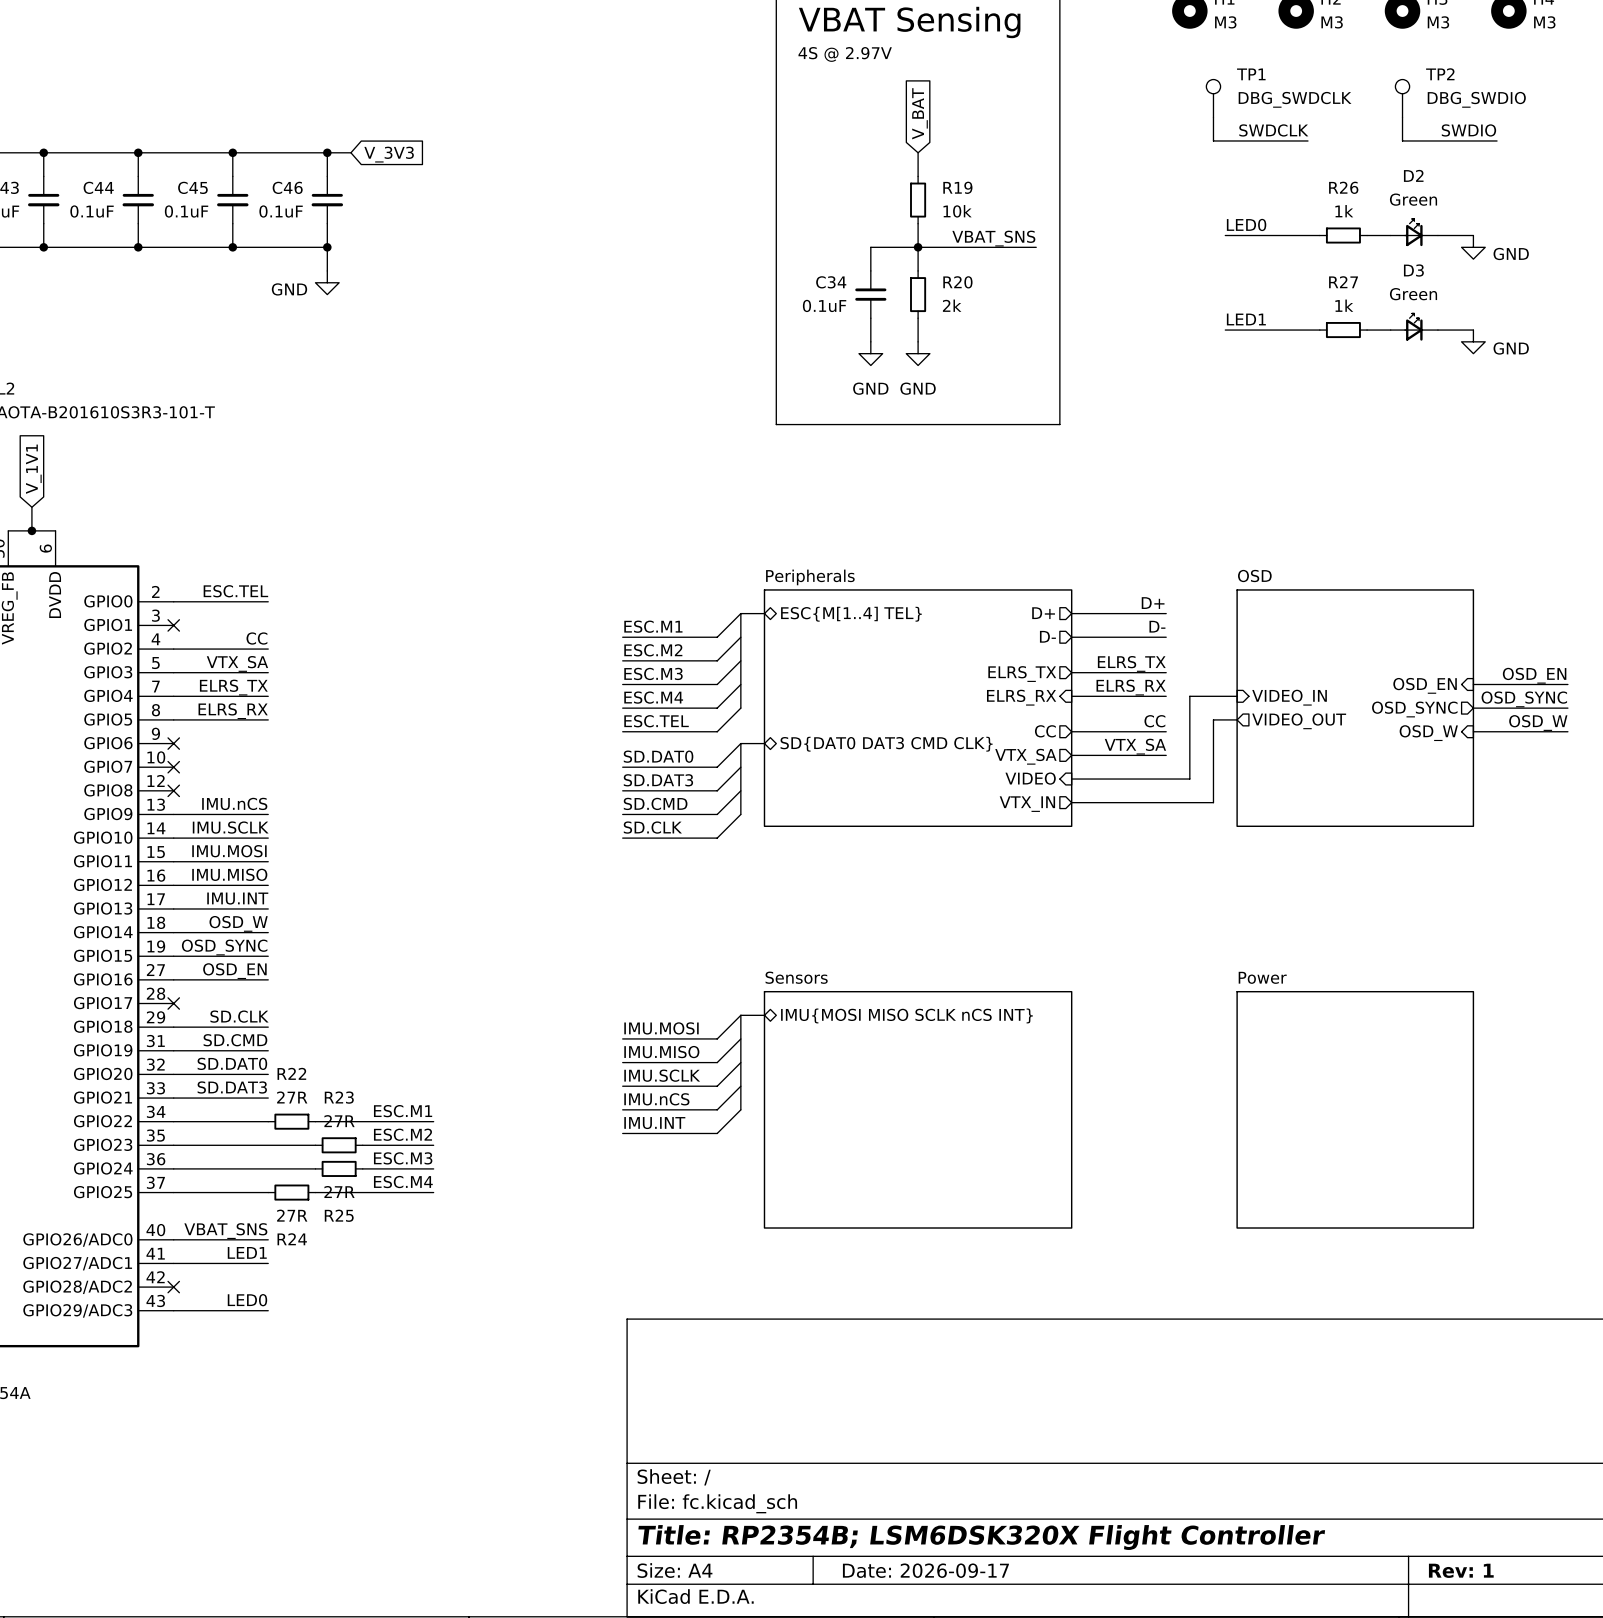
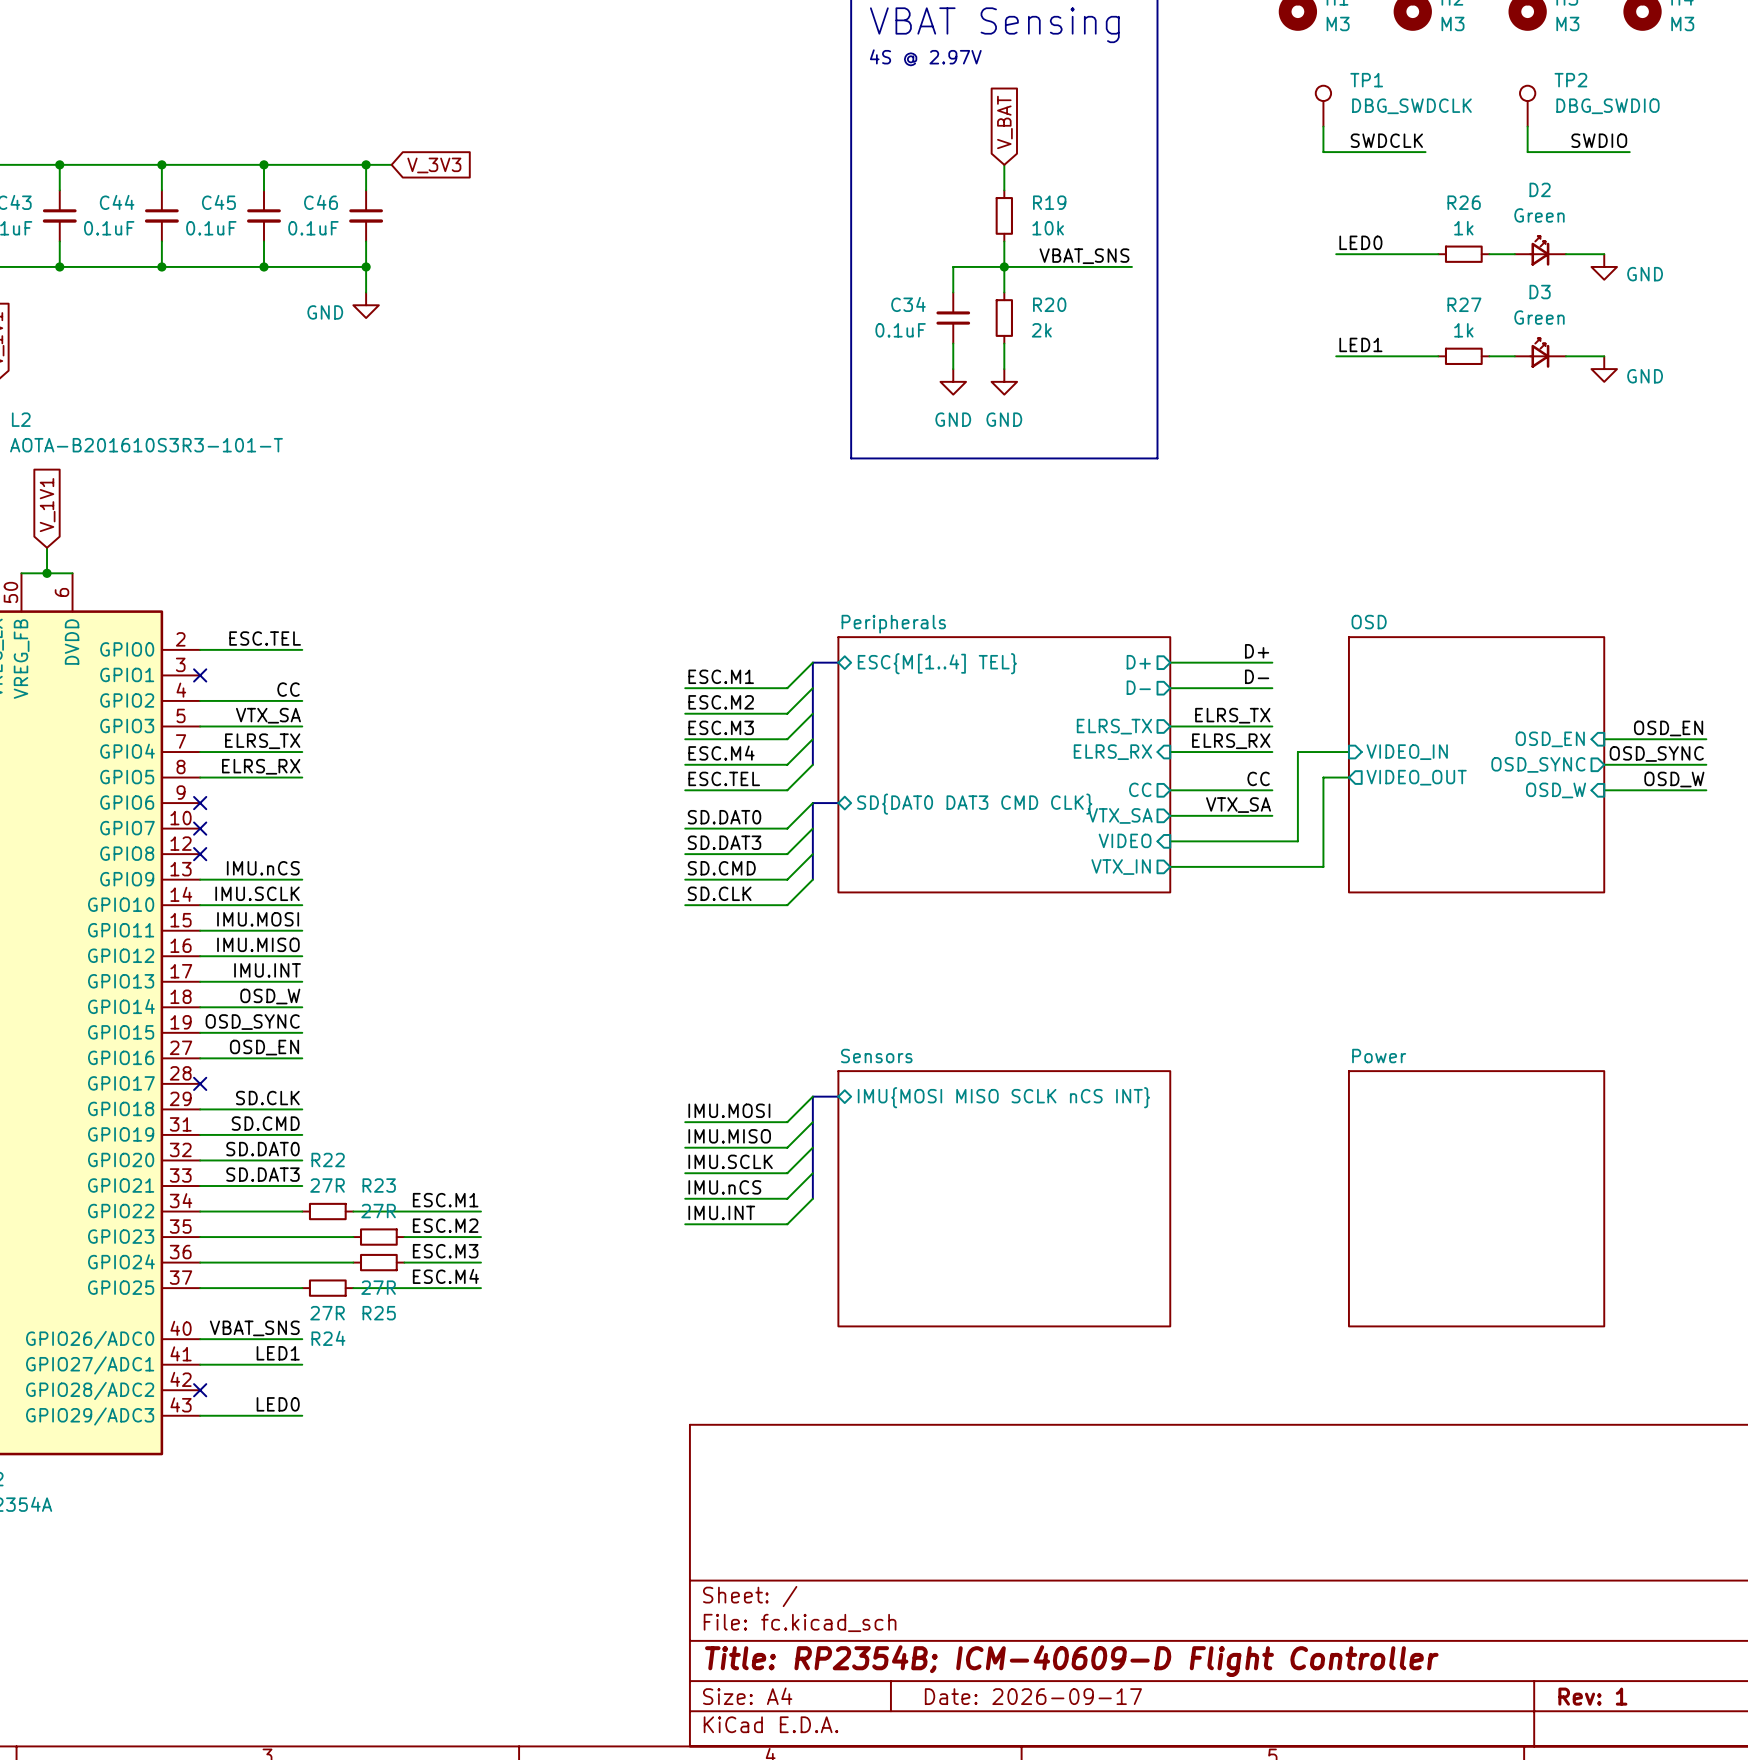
title block: Title: RP2354B; LSM6DSK320X Flight Controller (981, 1537) -> Title: RP2354B; ICM-40609-D Flight Controller (1071, 1661)

